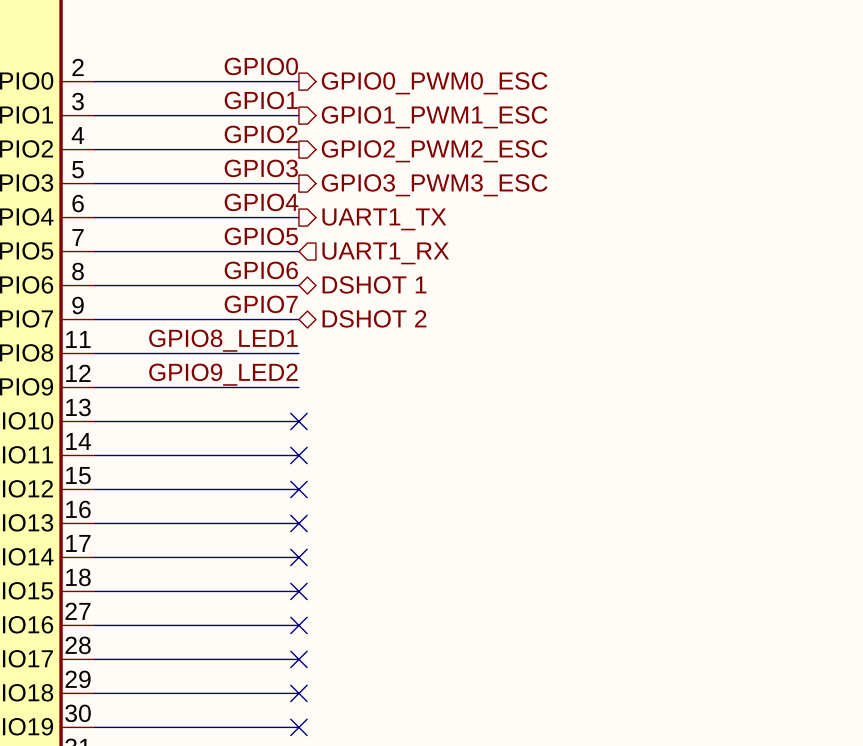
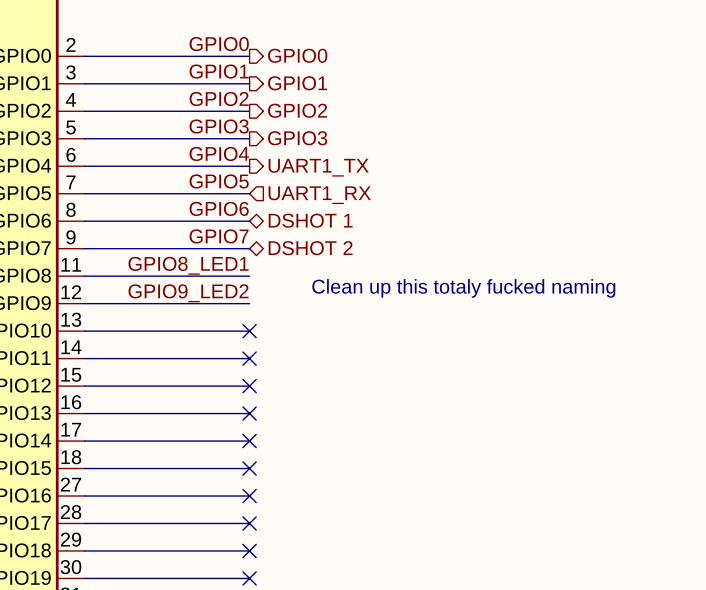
hierarchical label: GPIO0_PWM0_ESC (434, 83) -> GPIO0 (297, 55)
hierarchical label: GPIO1_PWM1_ESC (434, 117) -> GPIO1 (297, 83)
hierarchical label: GPIO2_PWM2_ESC (434, 151) -> GPIO2 (297, 110)
hierarchical label: GPIO3_PWM3_ESC (434, 185) -> GPIO3 (297, 138)
text: none -> Clean up this totaly fucked naming (463, 288)

